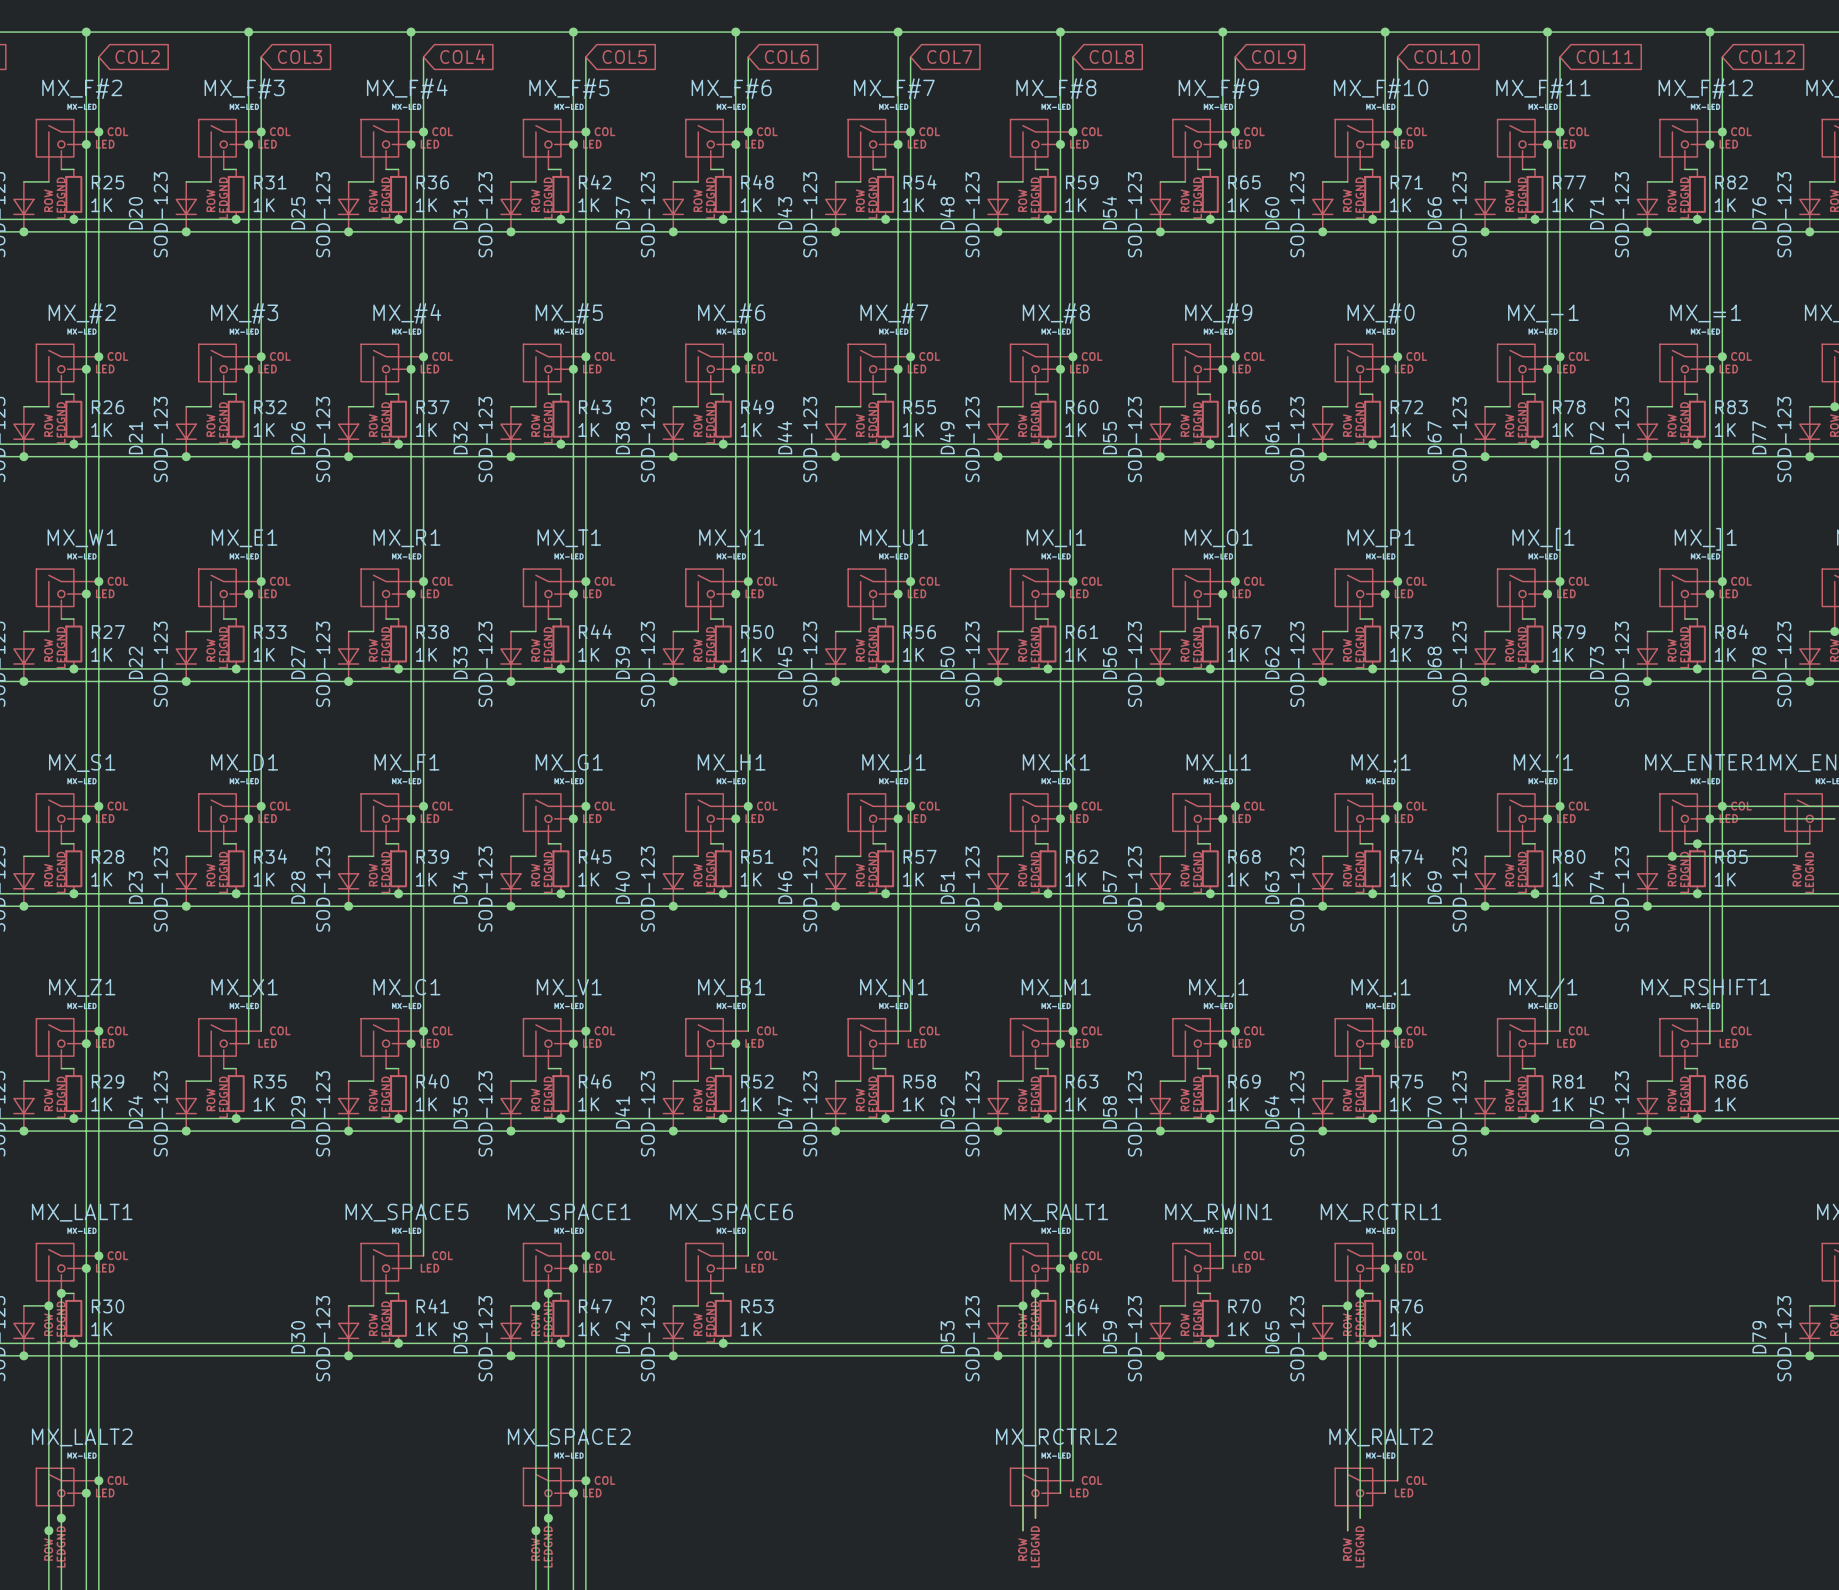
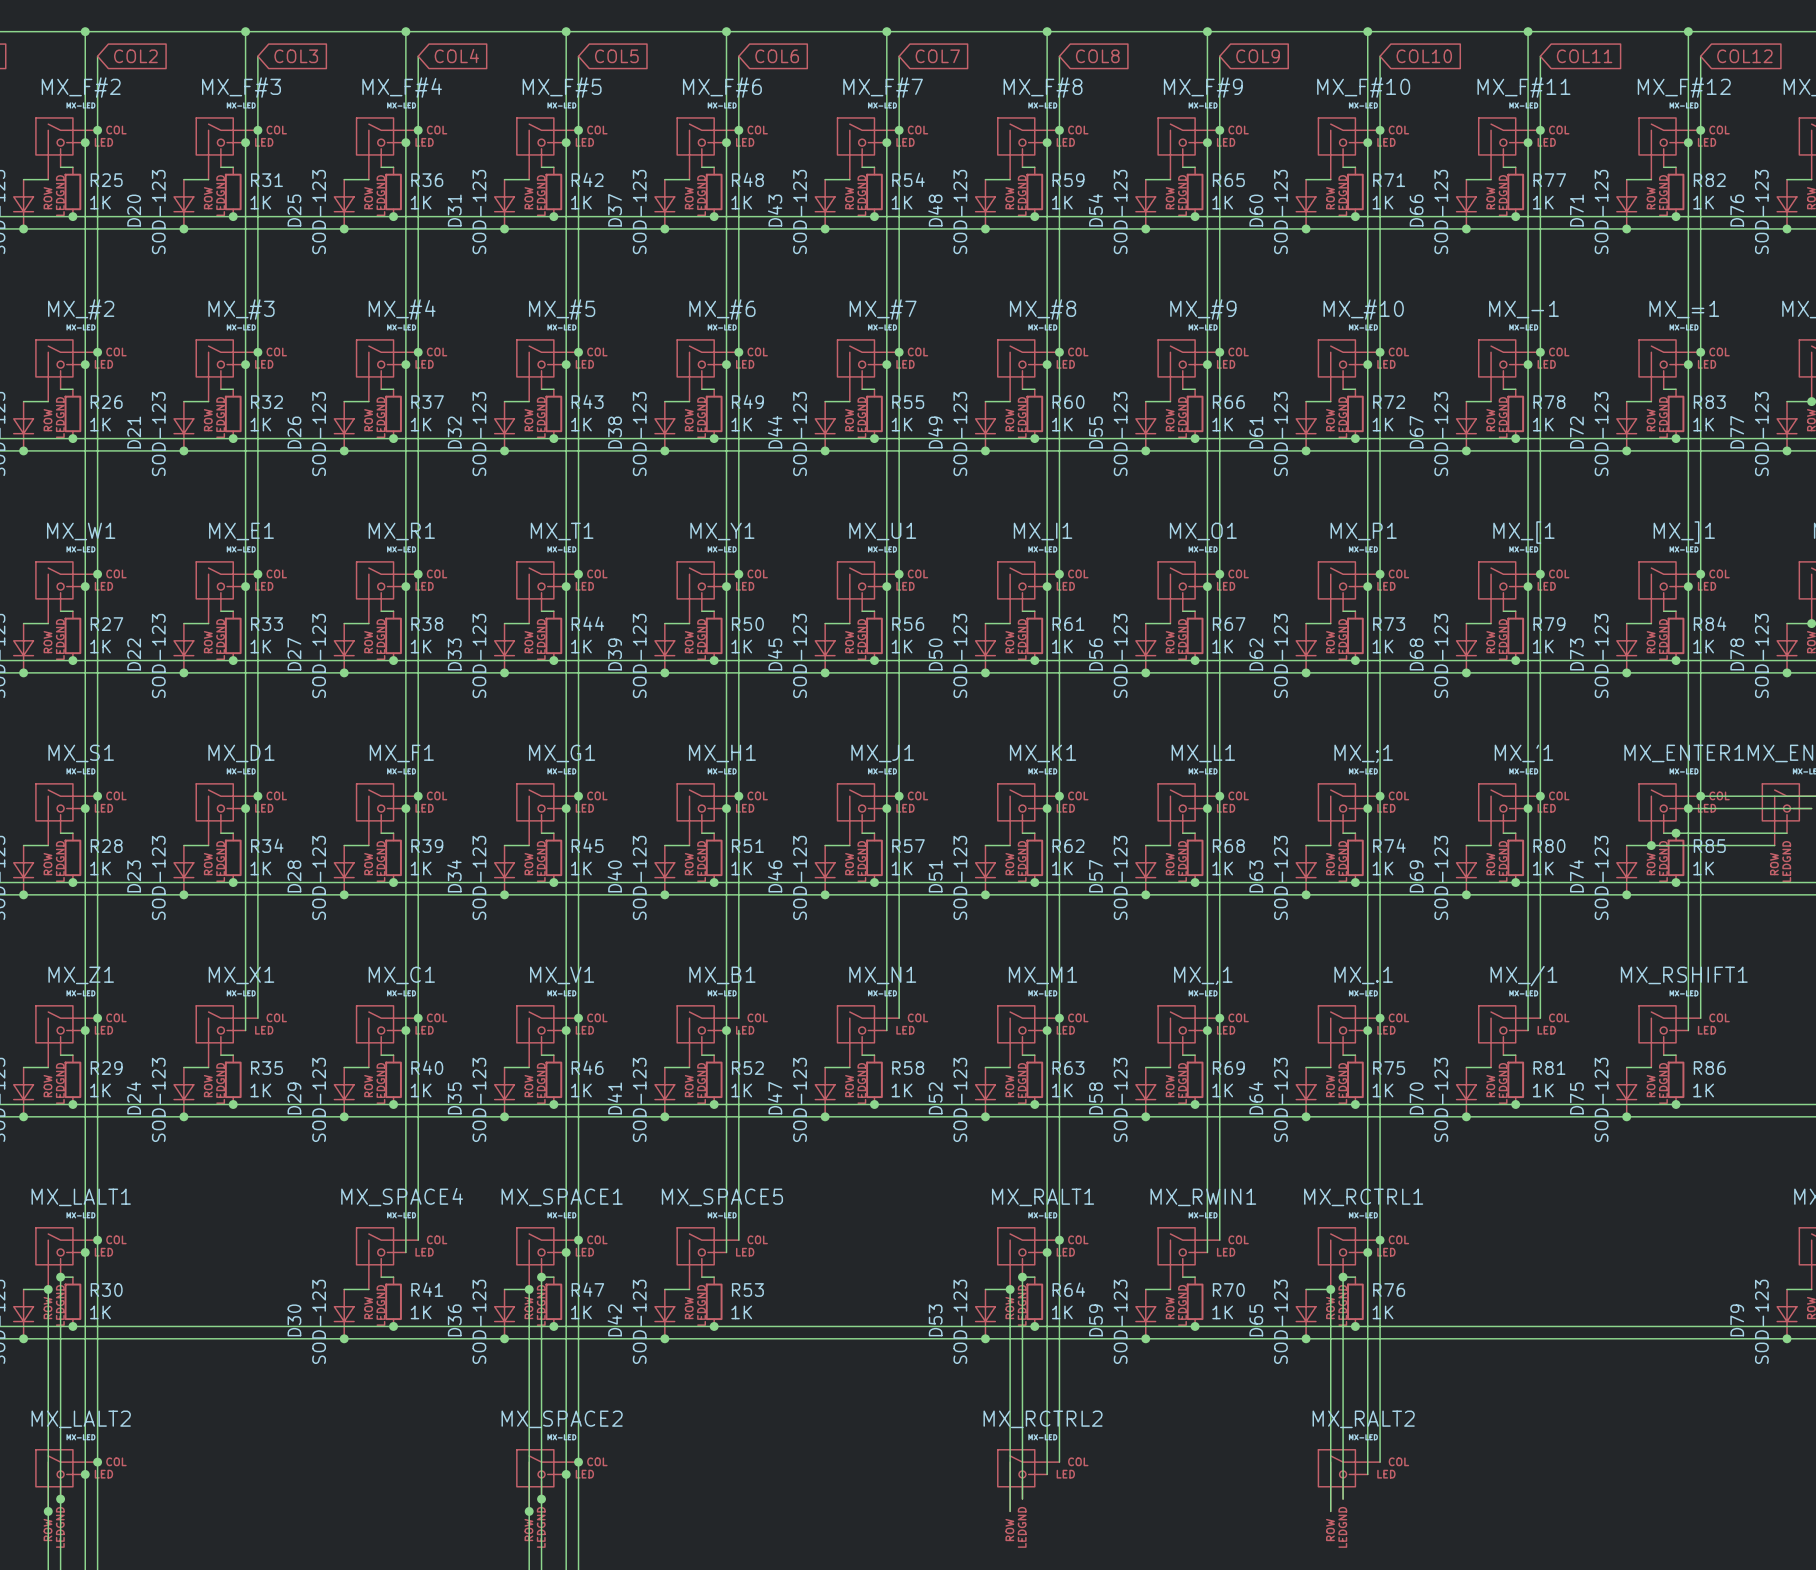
MX_#0 name: MX_#0 (1381, 313) -> MX_#10 (1363, 309)
MX_SPACE5 name: MX_SPACE5 (406, 1212) -> MX_SPACE4 (402, 1197)
MX_SPACE6 name: MX_SPACE6 (731, 1212) -> MX_SPACE5 (722, 1197)

